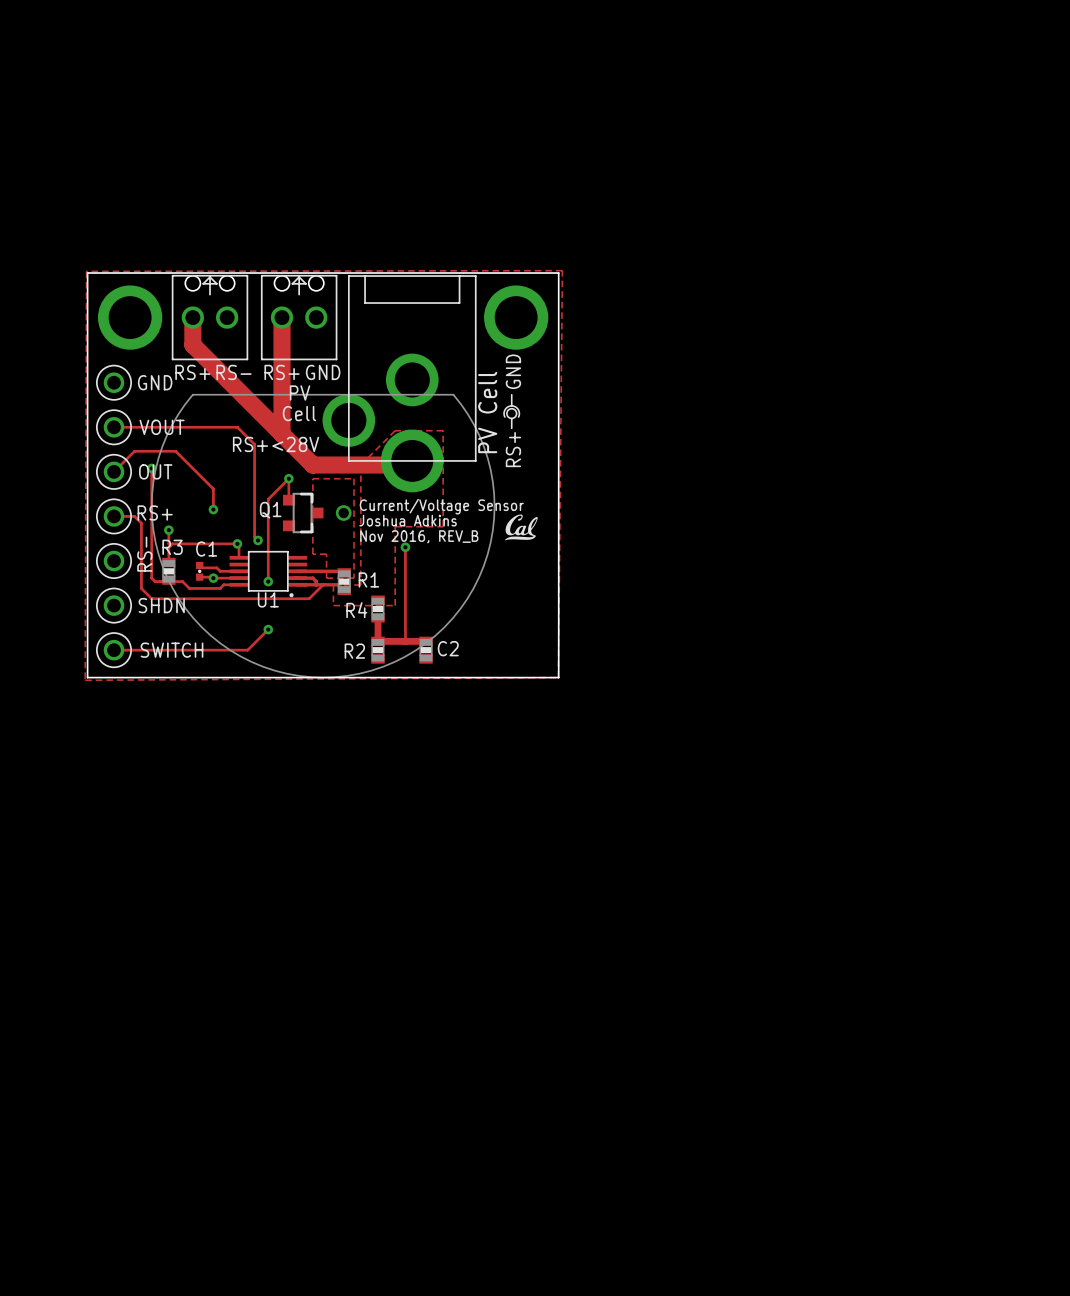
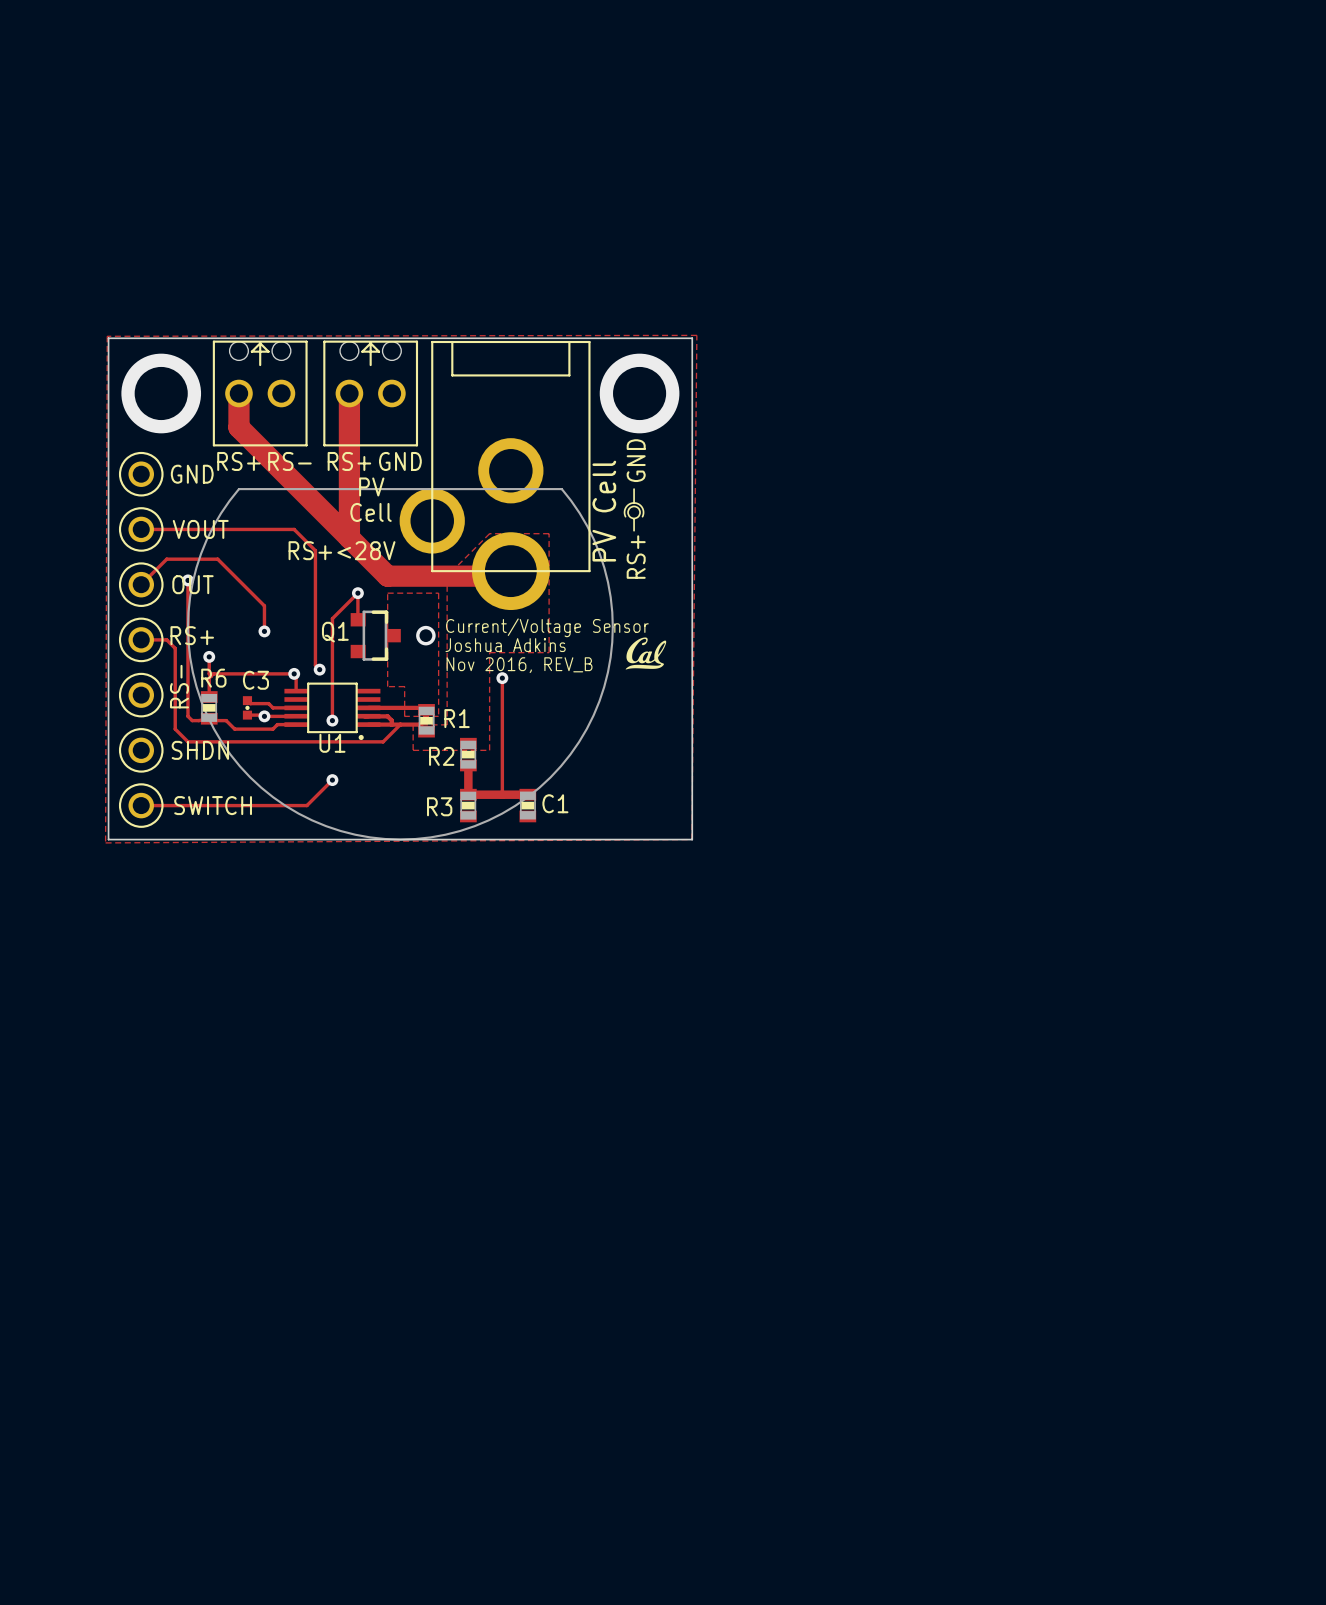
R3 name: R3 (172, 547) -> R6 (213, 678)
C1 name: C1 (206, 549) -> C3 (255, 680)
R4 name: R4 (356, 610) -> R2 (441, 756)
C2 name: C2 (448, 648) -> C1 (555, 803)
R2 name: R2 (354, 651) -> R3 (439, 806)

